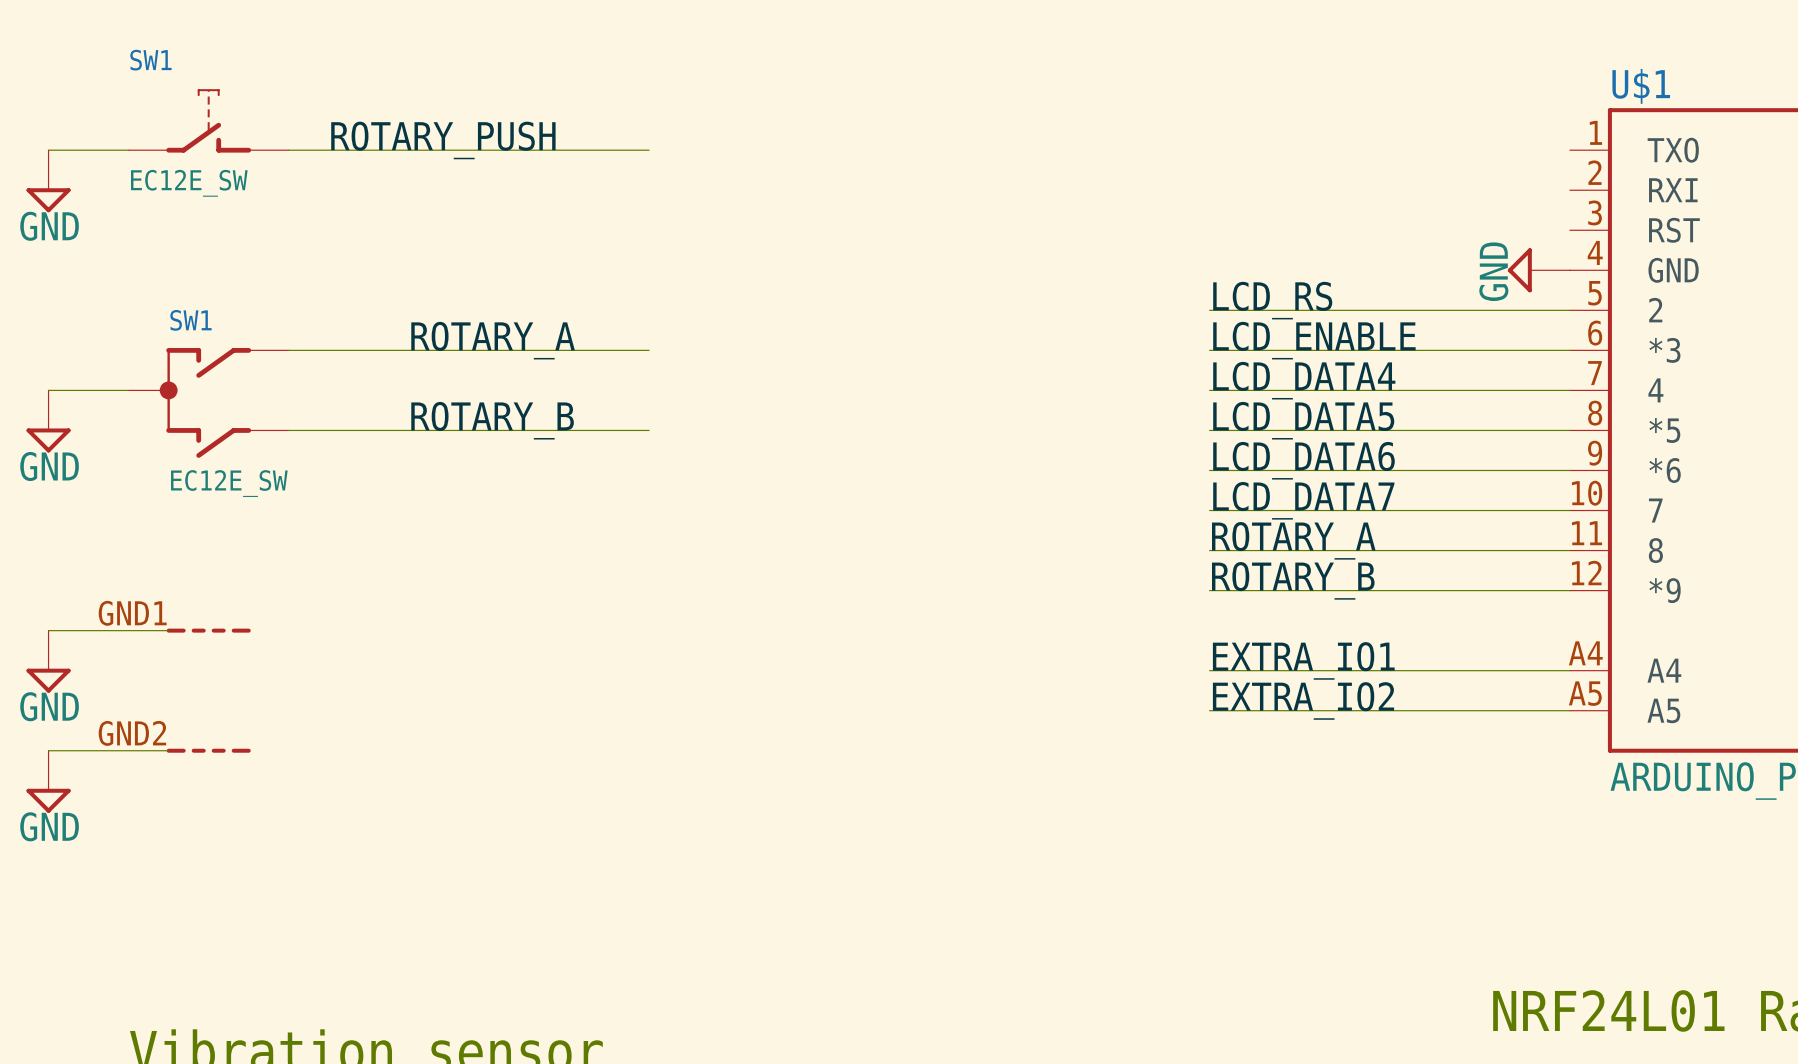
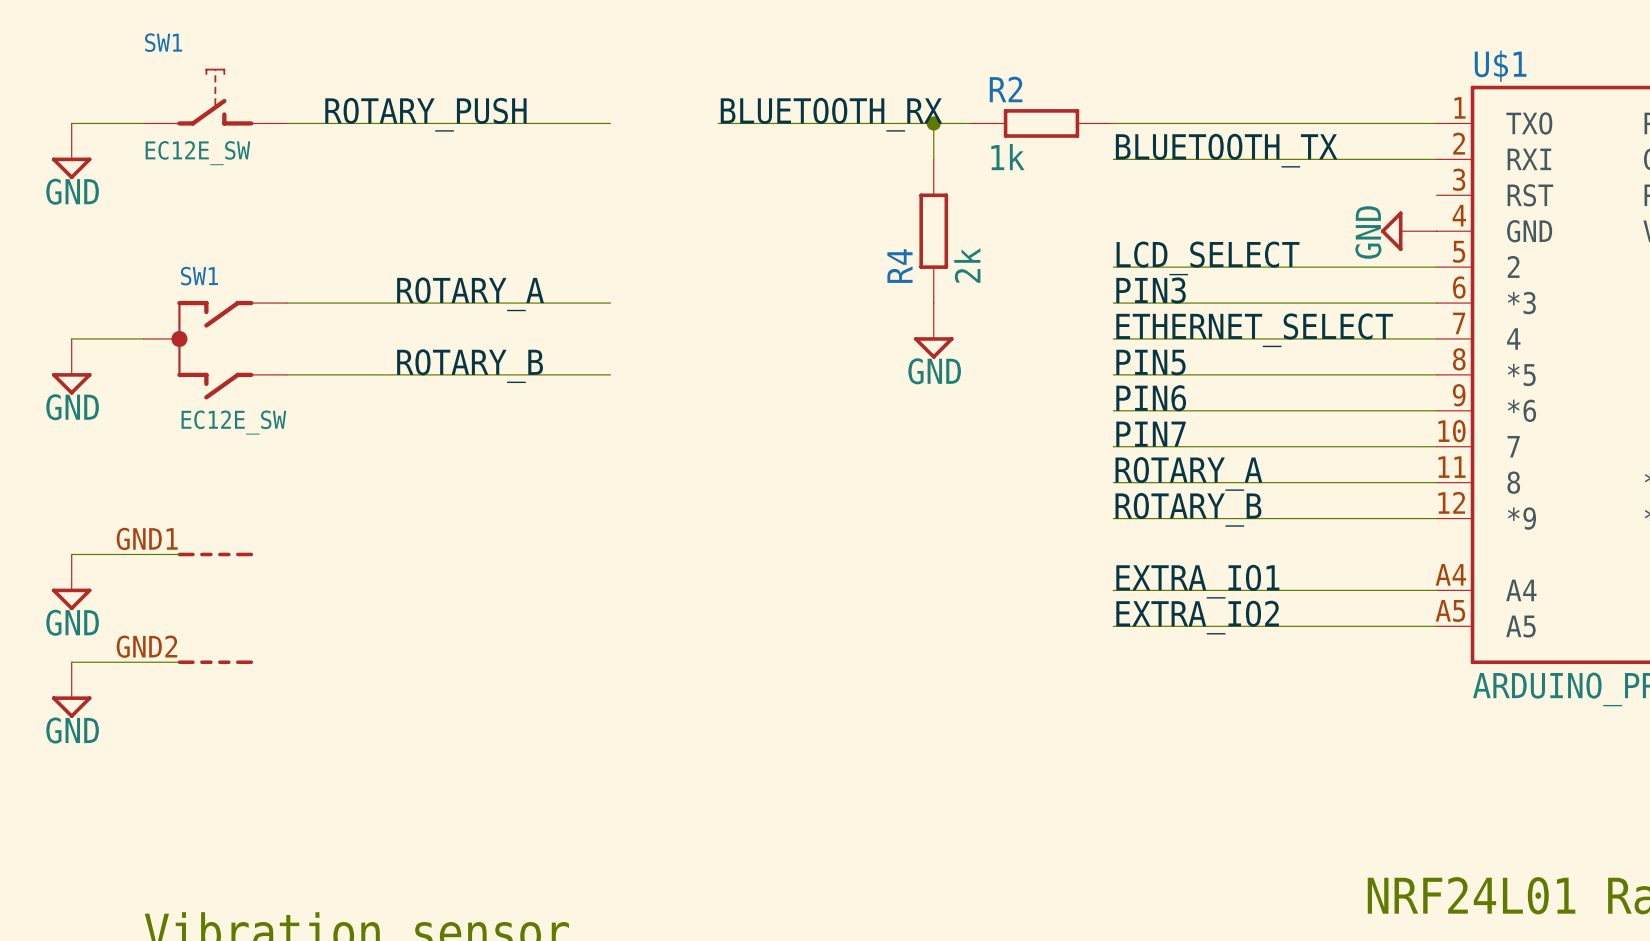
label: none -> BLUETOOTH_RX (831, 114)
wire: none -> (718, 123) (969, 123)
wire: none -> (933, 123) (933, 159)
junction: none -> (933, 123)
R2: none -> 1k (1041, 123)
wire: none -> (1113, 123) (1436, 123)
label: none -> BLUETOOTH_TX (1226, 150)
wire: none -> (1113, 159) (1436, 159)
R4: none -> 2k (933, 231)
label: LCD_RS (1272, 300) -> LCD_SELECT (1208, 258)
label: LCD_ENABLE (1314, 340) -> PIN3 (1151, 290)
label: LCD_DATA4 (1304, 380) -> ETHERNET_SELECT (1254, 330)
power symbol: none -> GND (933, 330)
label: LCD_DATA5 (1303, 420) -> PIN5 (1150, 362)
label: LCD_DATA6 (1303, 460) -> PIN6 (1151, 398)
label: LCD_DATA7 (1303, 500) -> PIN7 (1151, 434)

